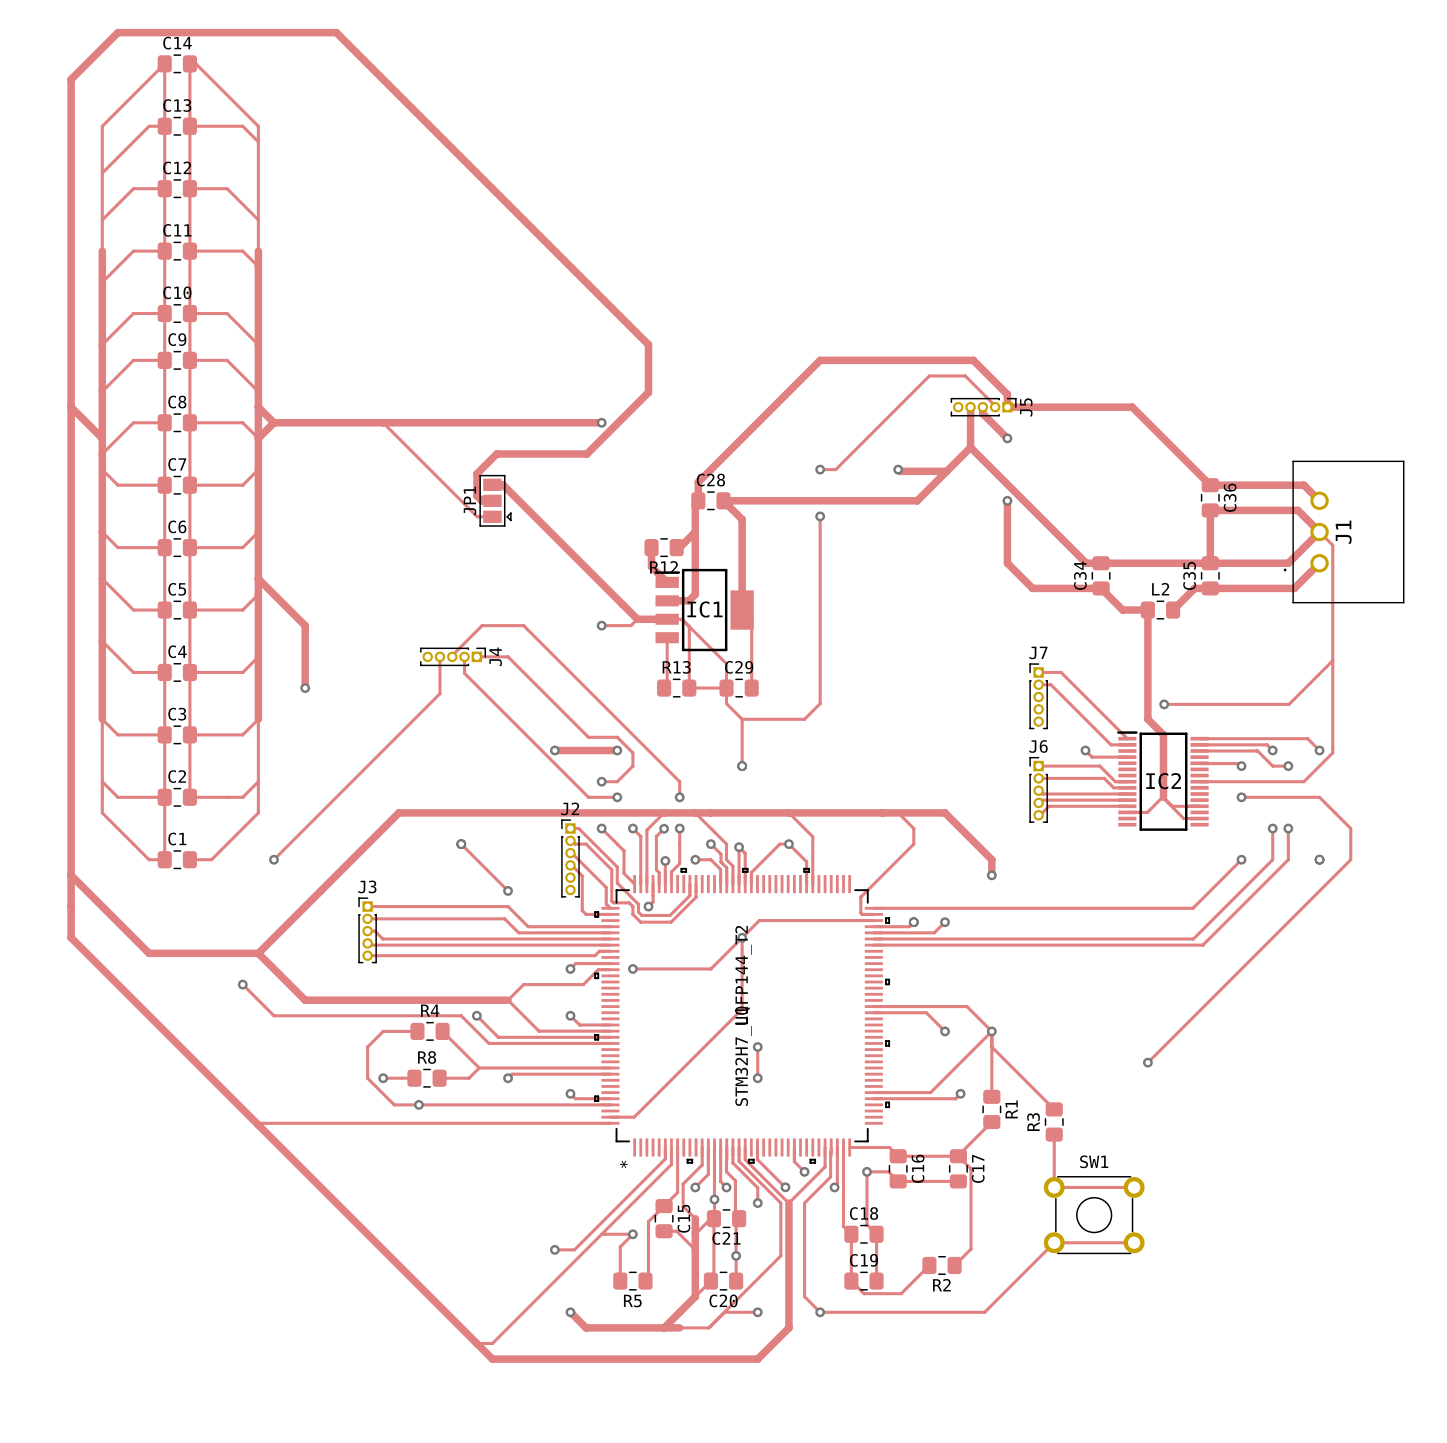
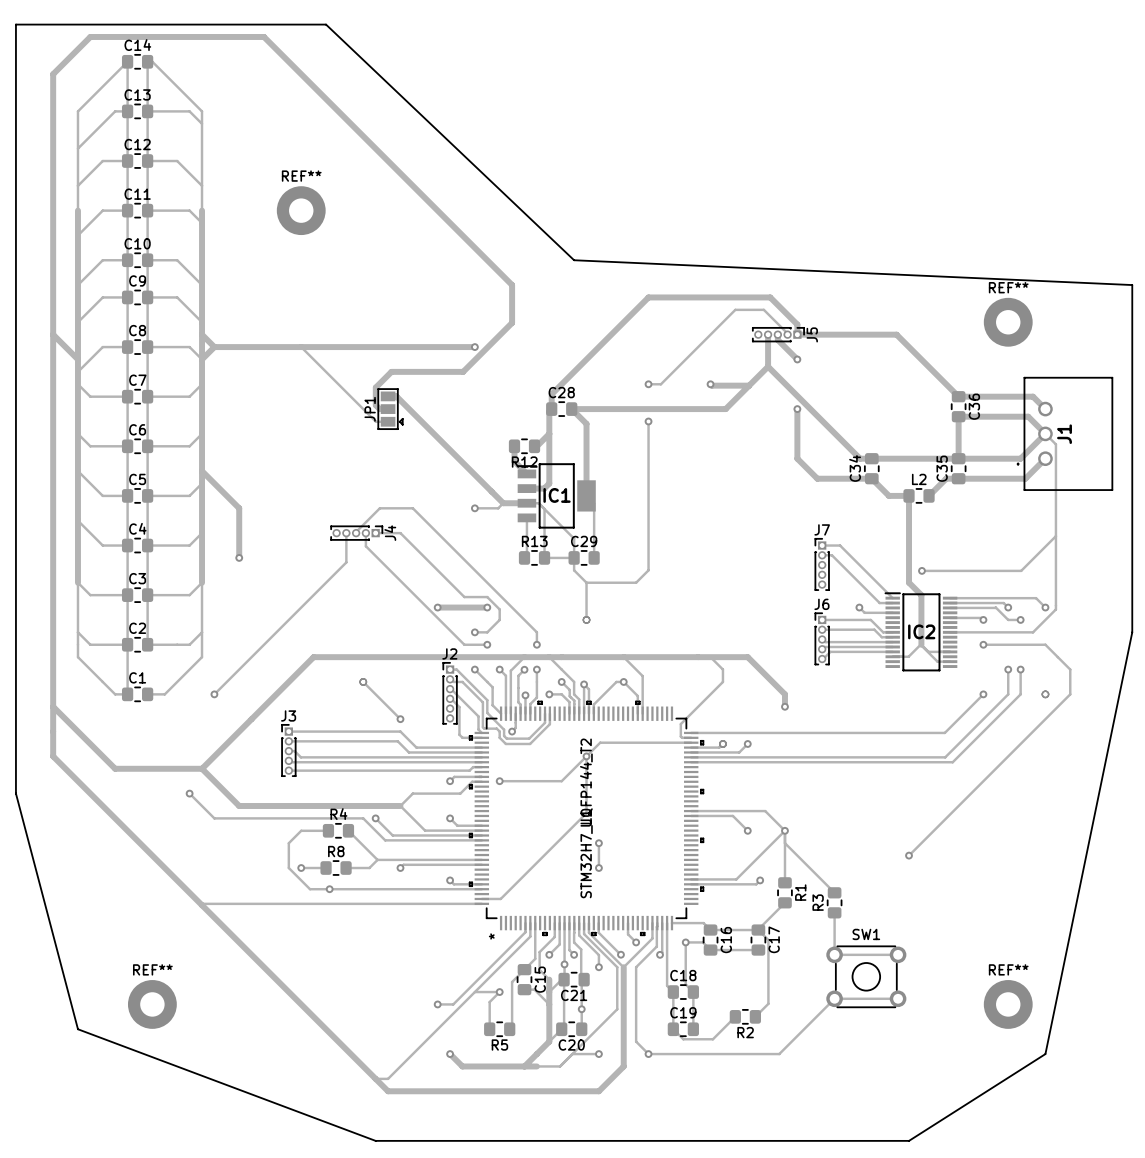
board edge: none -> (15, 24) (15, 793) (77, 1029) (375, 1140) (909, 1140) (1045, 1054) (1132, 632) (1132, 285) (574, 260) (326, 24) (15, 24)
REF**: none -> (301, 210)
REF**: none -> (1008, 322)
REF**: none -> (152, 1004)
REF**: none -> (1008, 1004)

